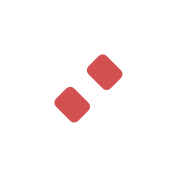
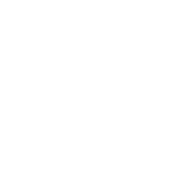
part: (88, 88) -> none

